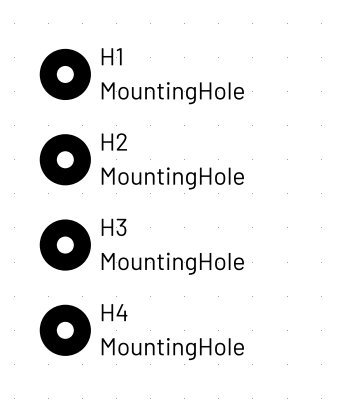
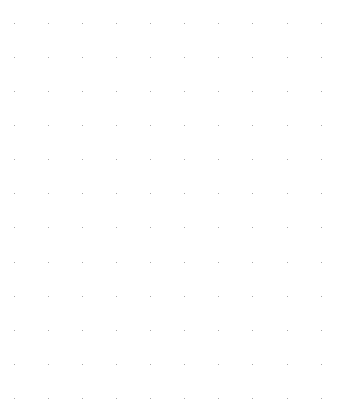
H1: MountingHole (65, 74) -> none
H2: MountingHole (65, 159) -> none
H3: MountingHole (65, 245) -> none
H4: MountingHole (65, 330) -> none

